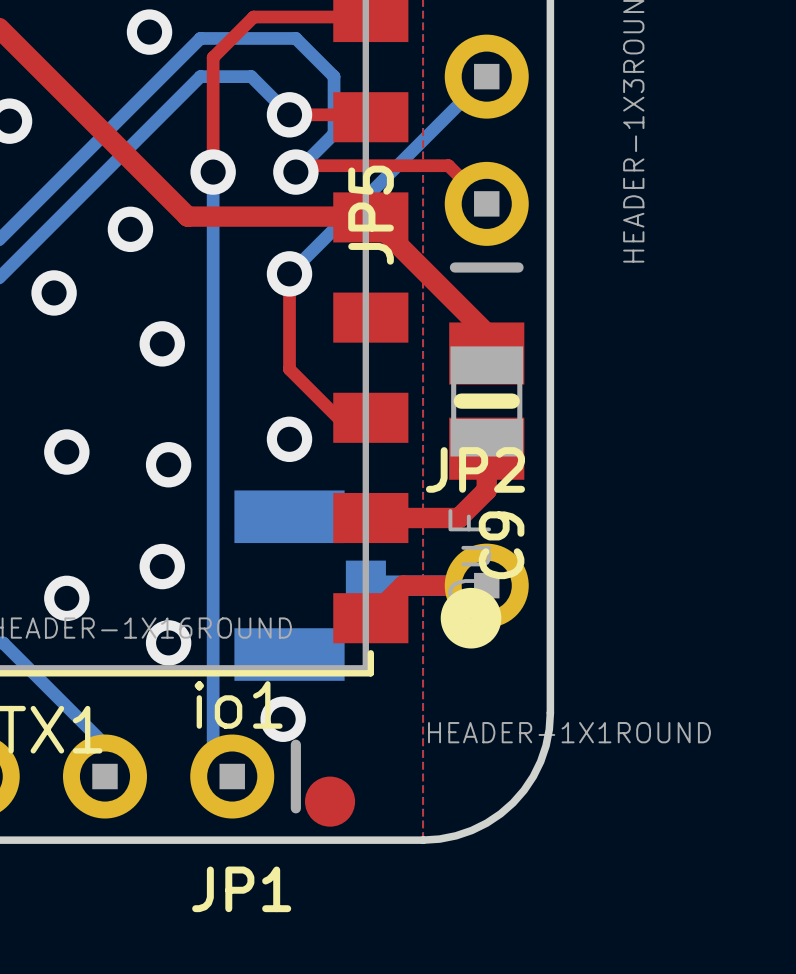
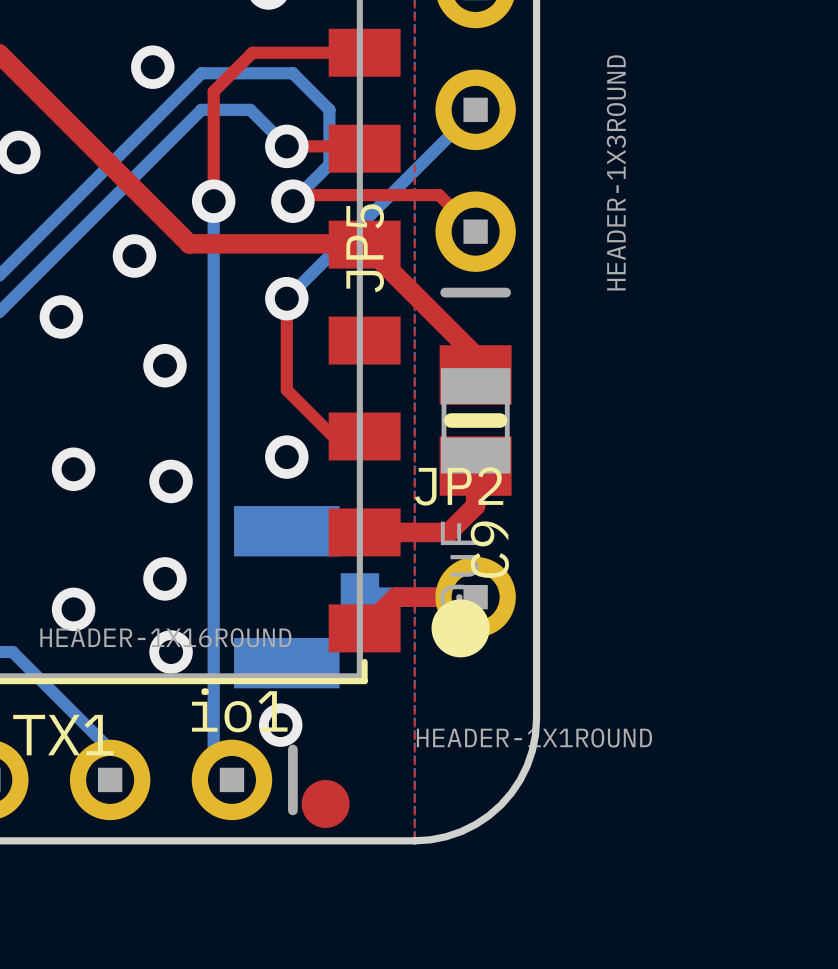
JP1 name: JP1 (241, 889) -> none

